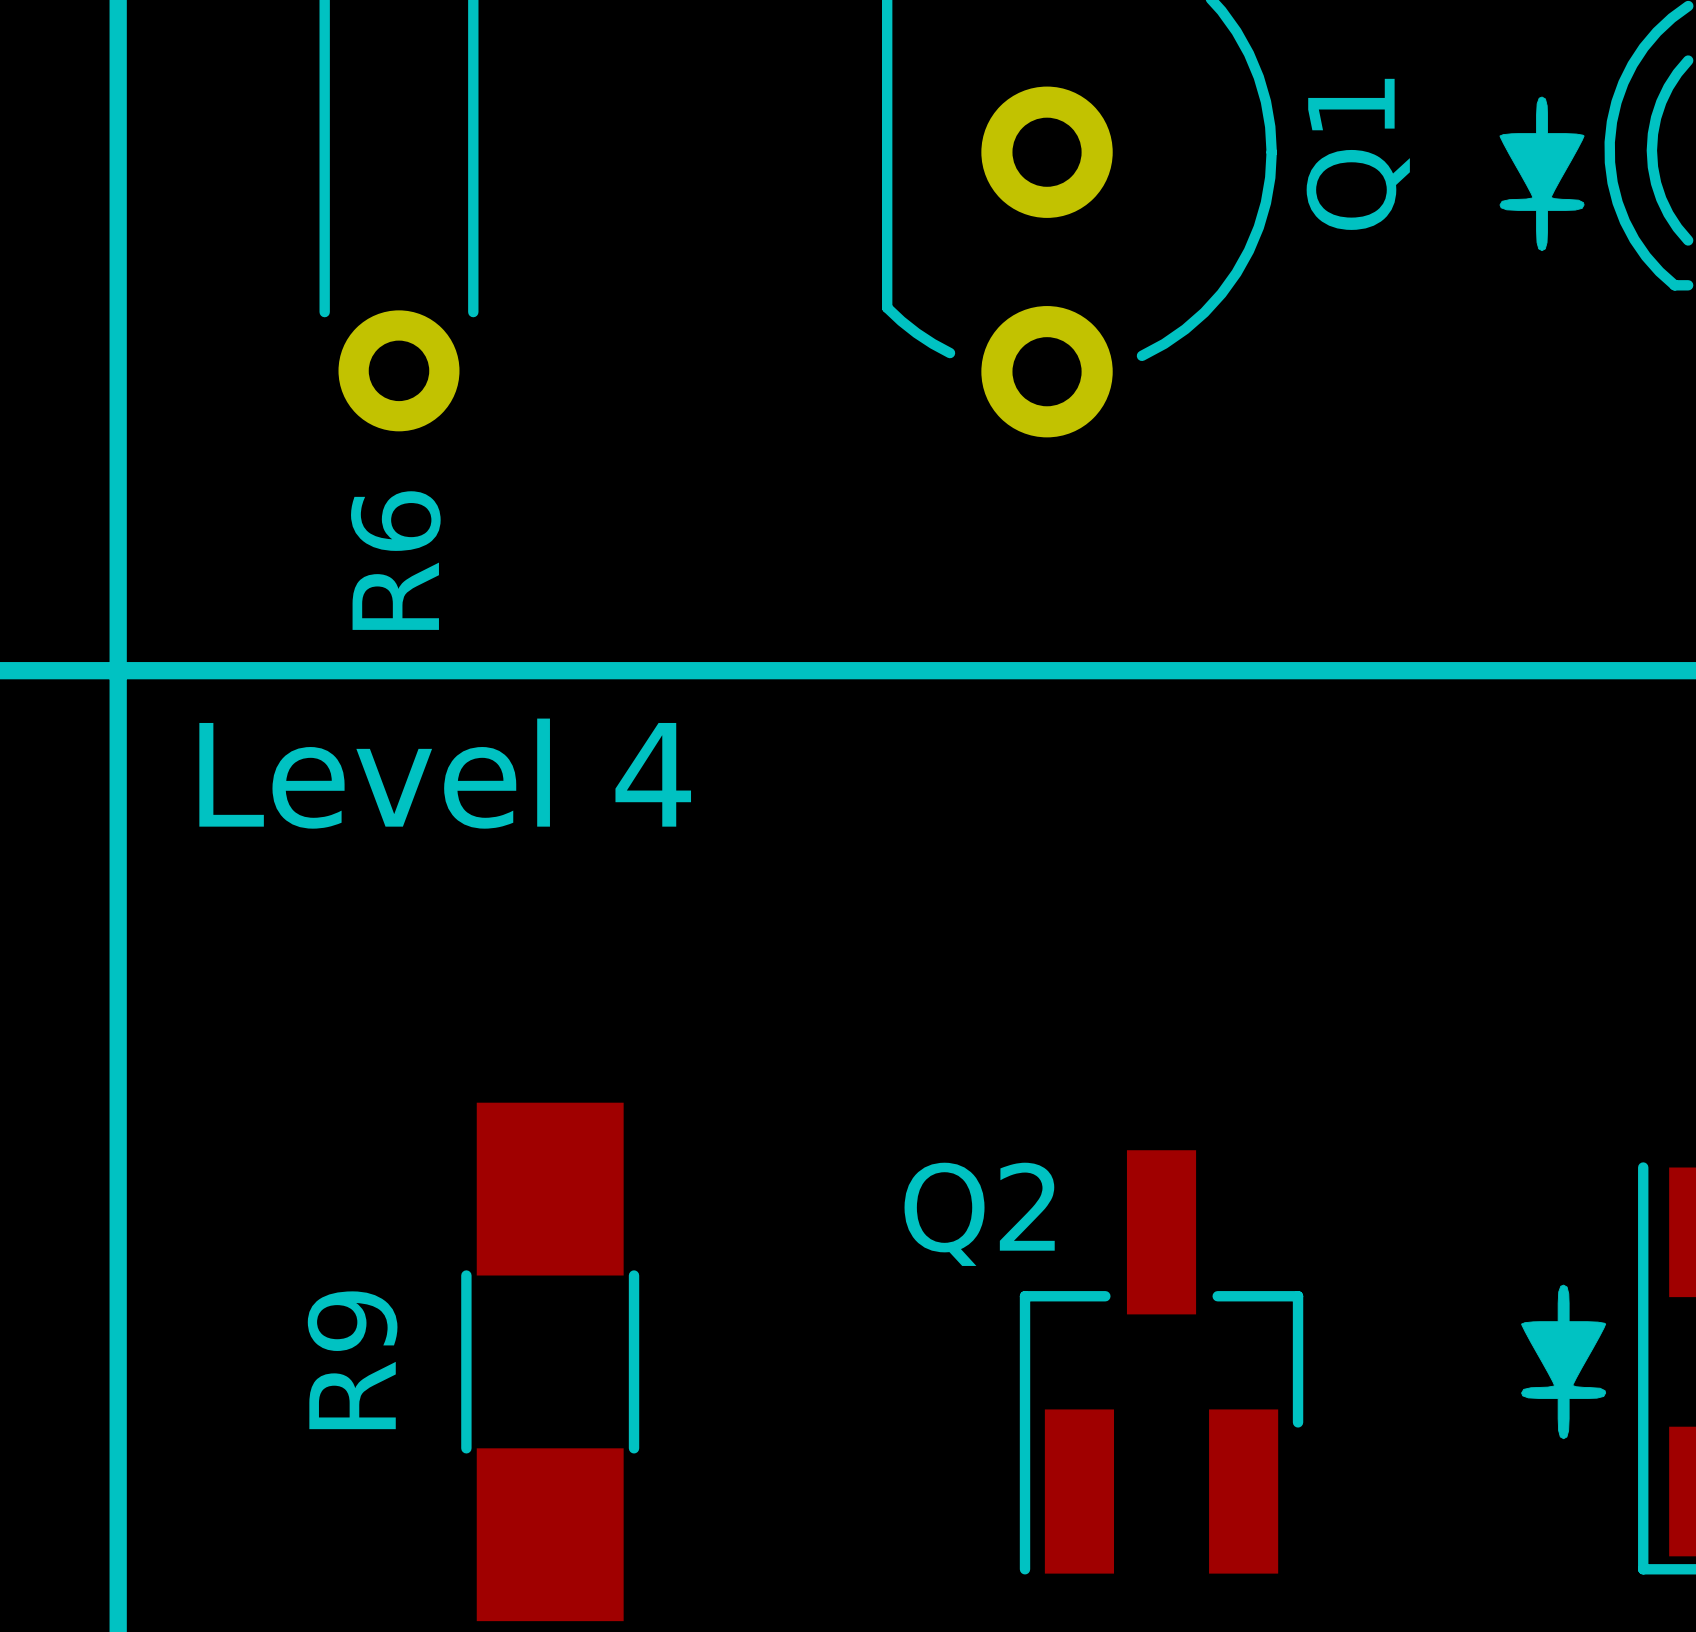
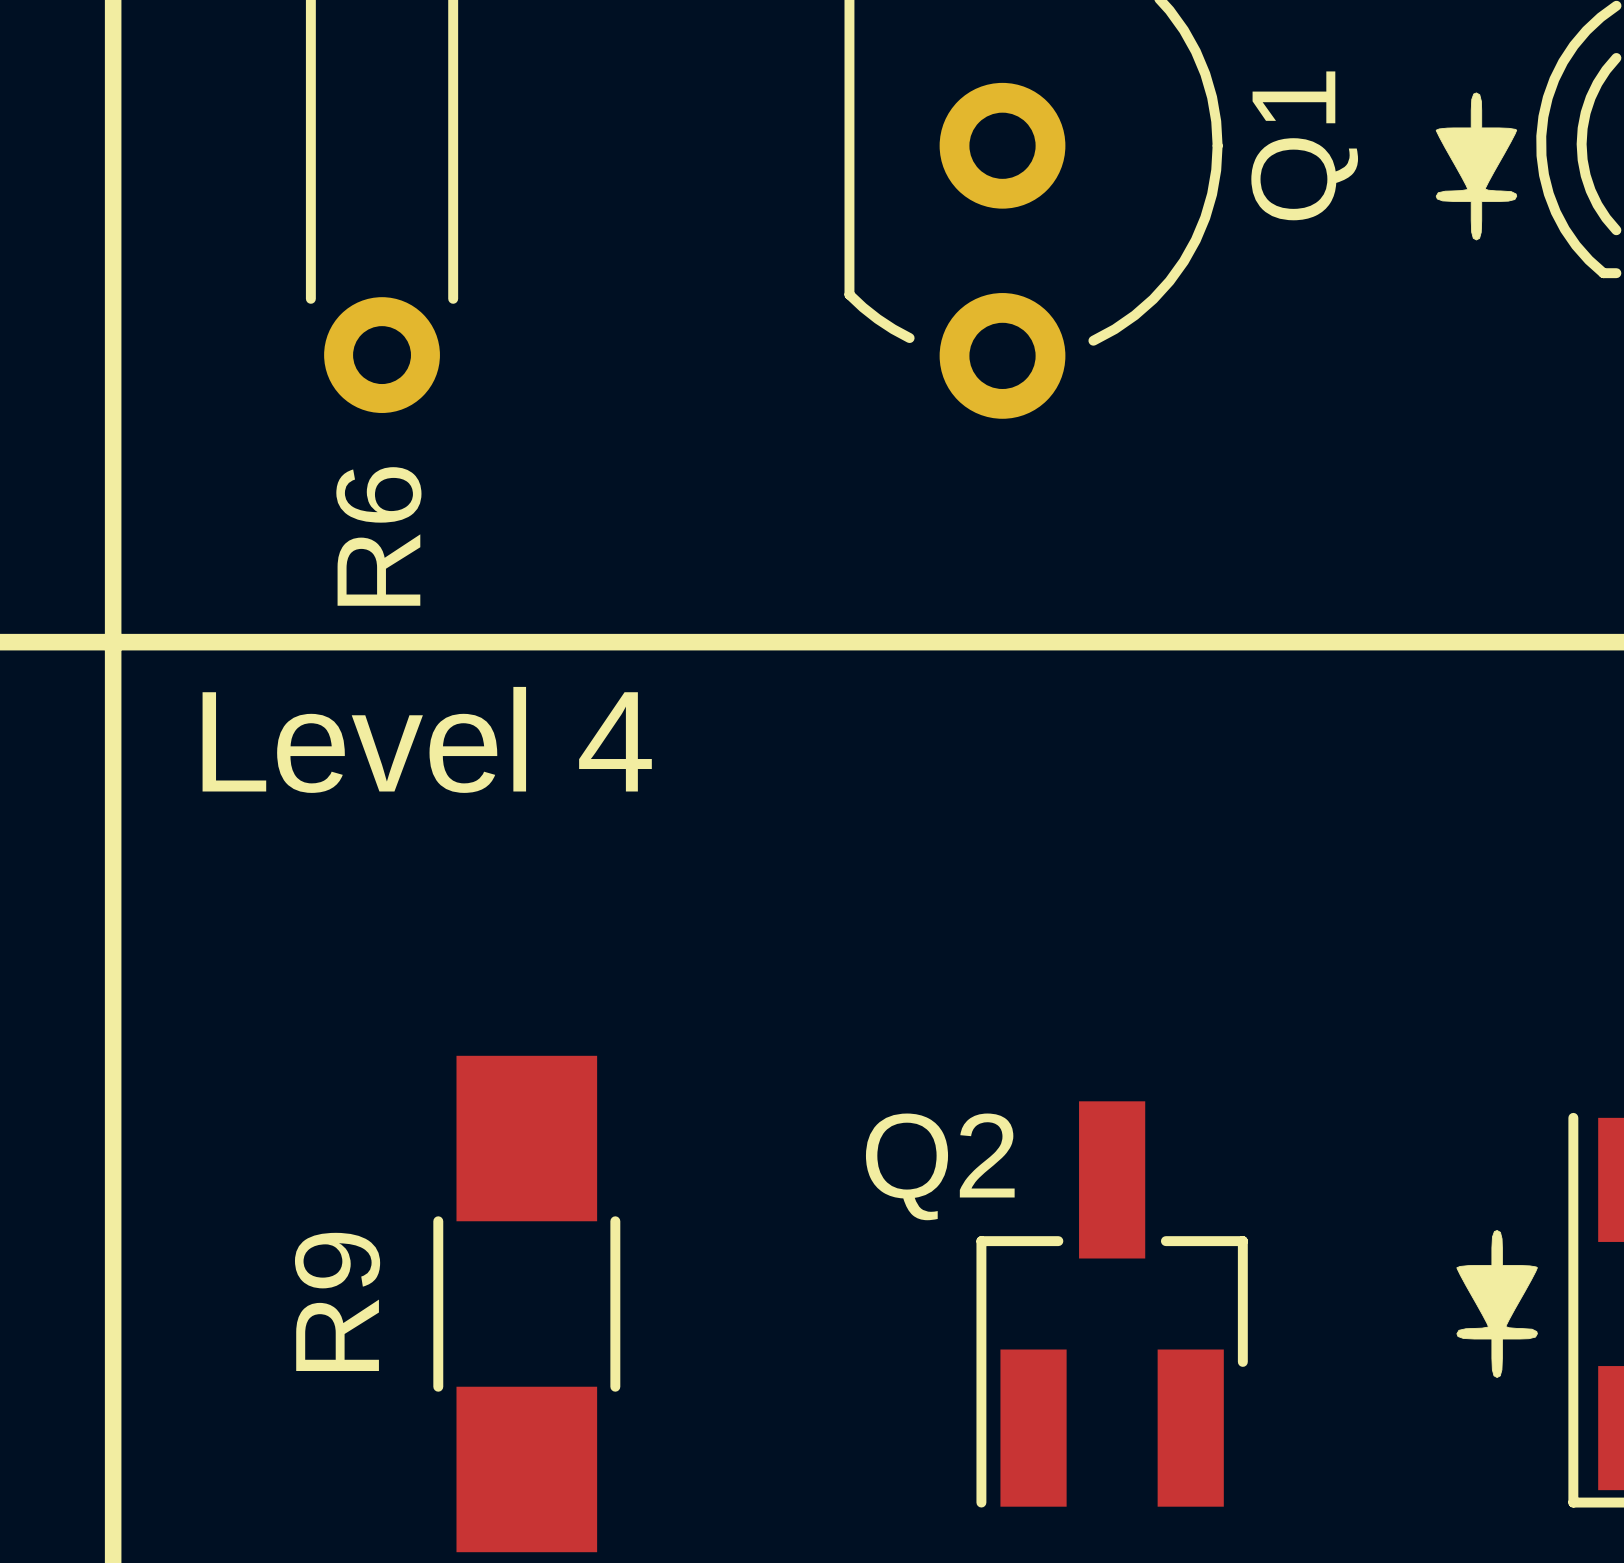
R9 footprint: [461, 1102, 640, 1622] -> [433, 1055, 621, 1553]

